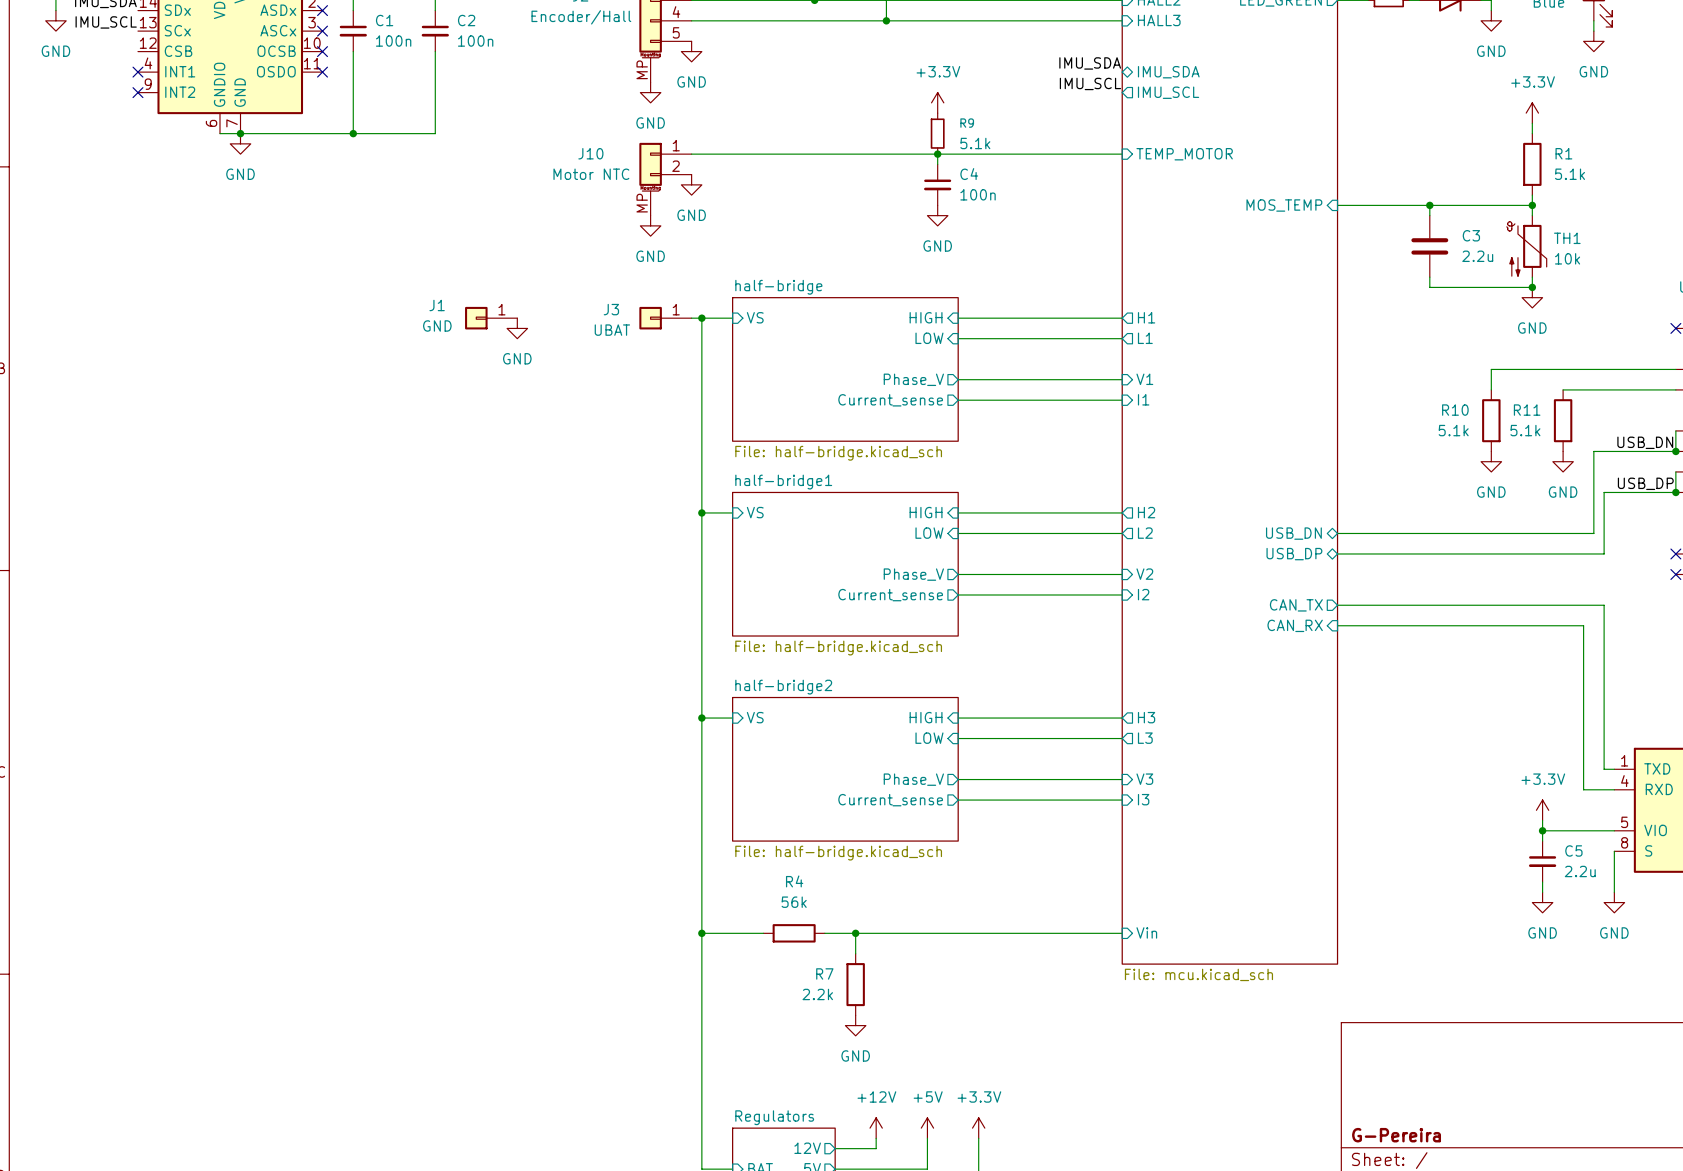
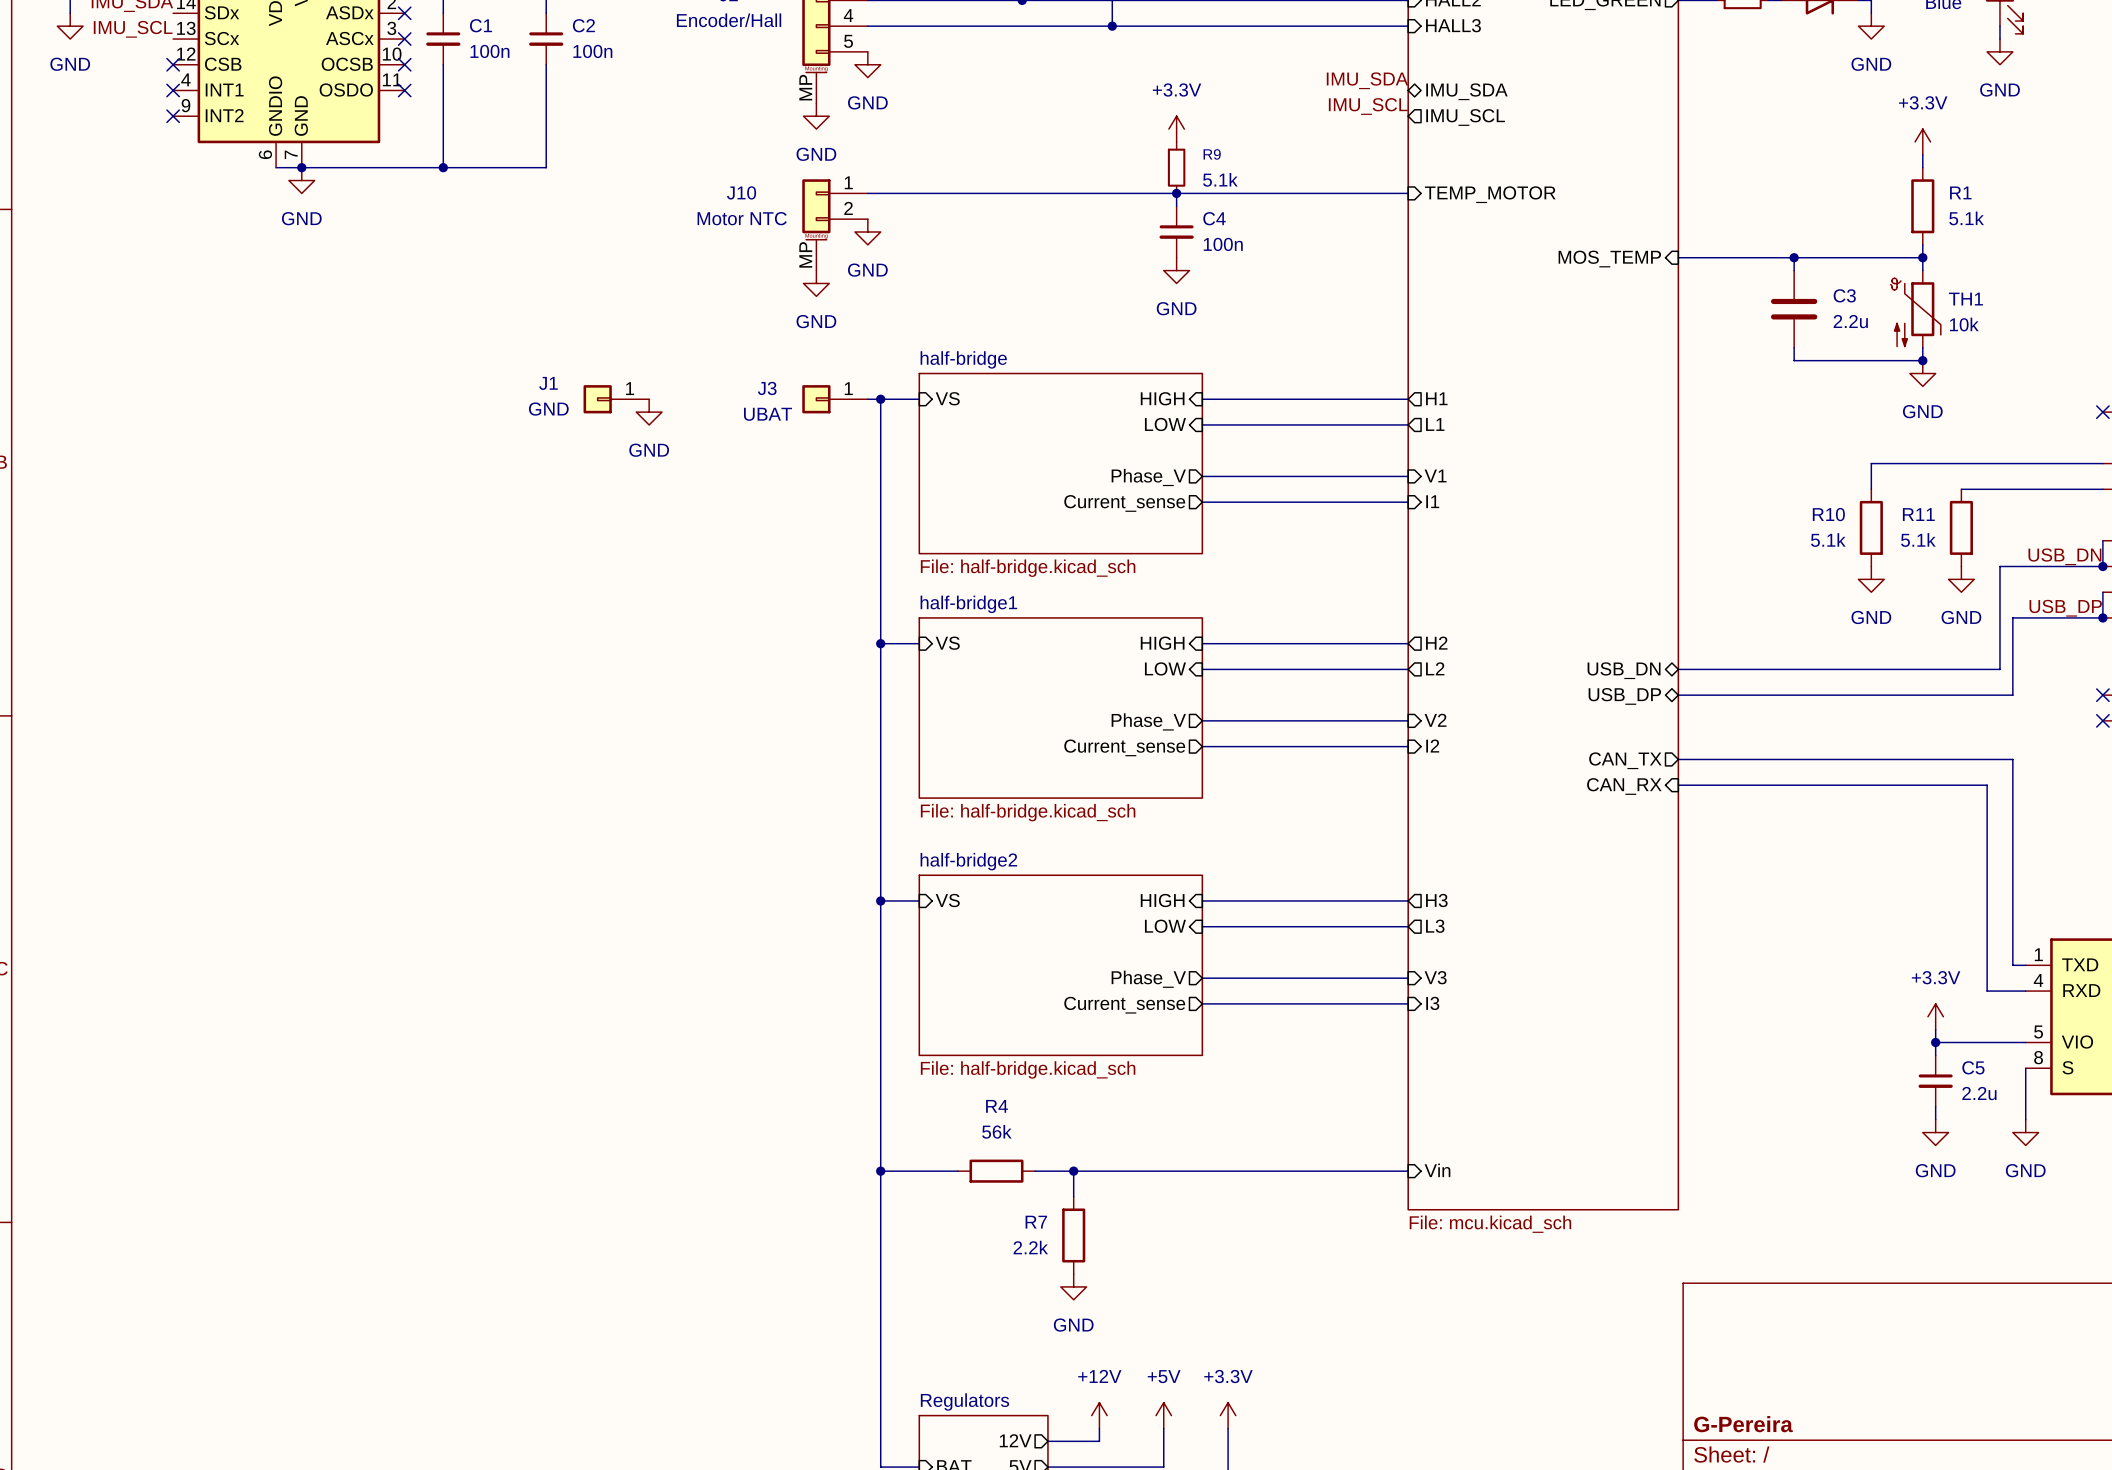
no-connect mark: none -> (173, 64)

